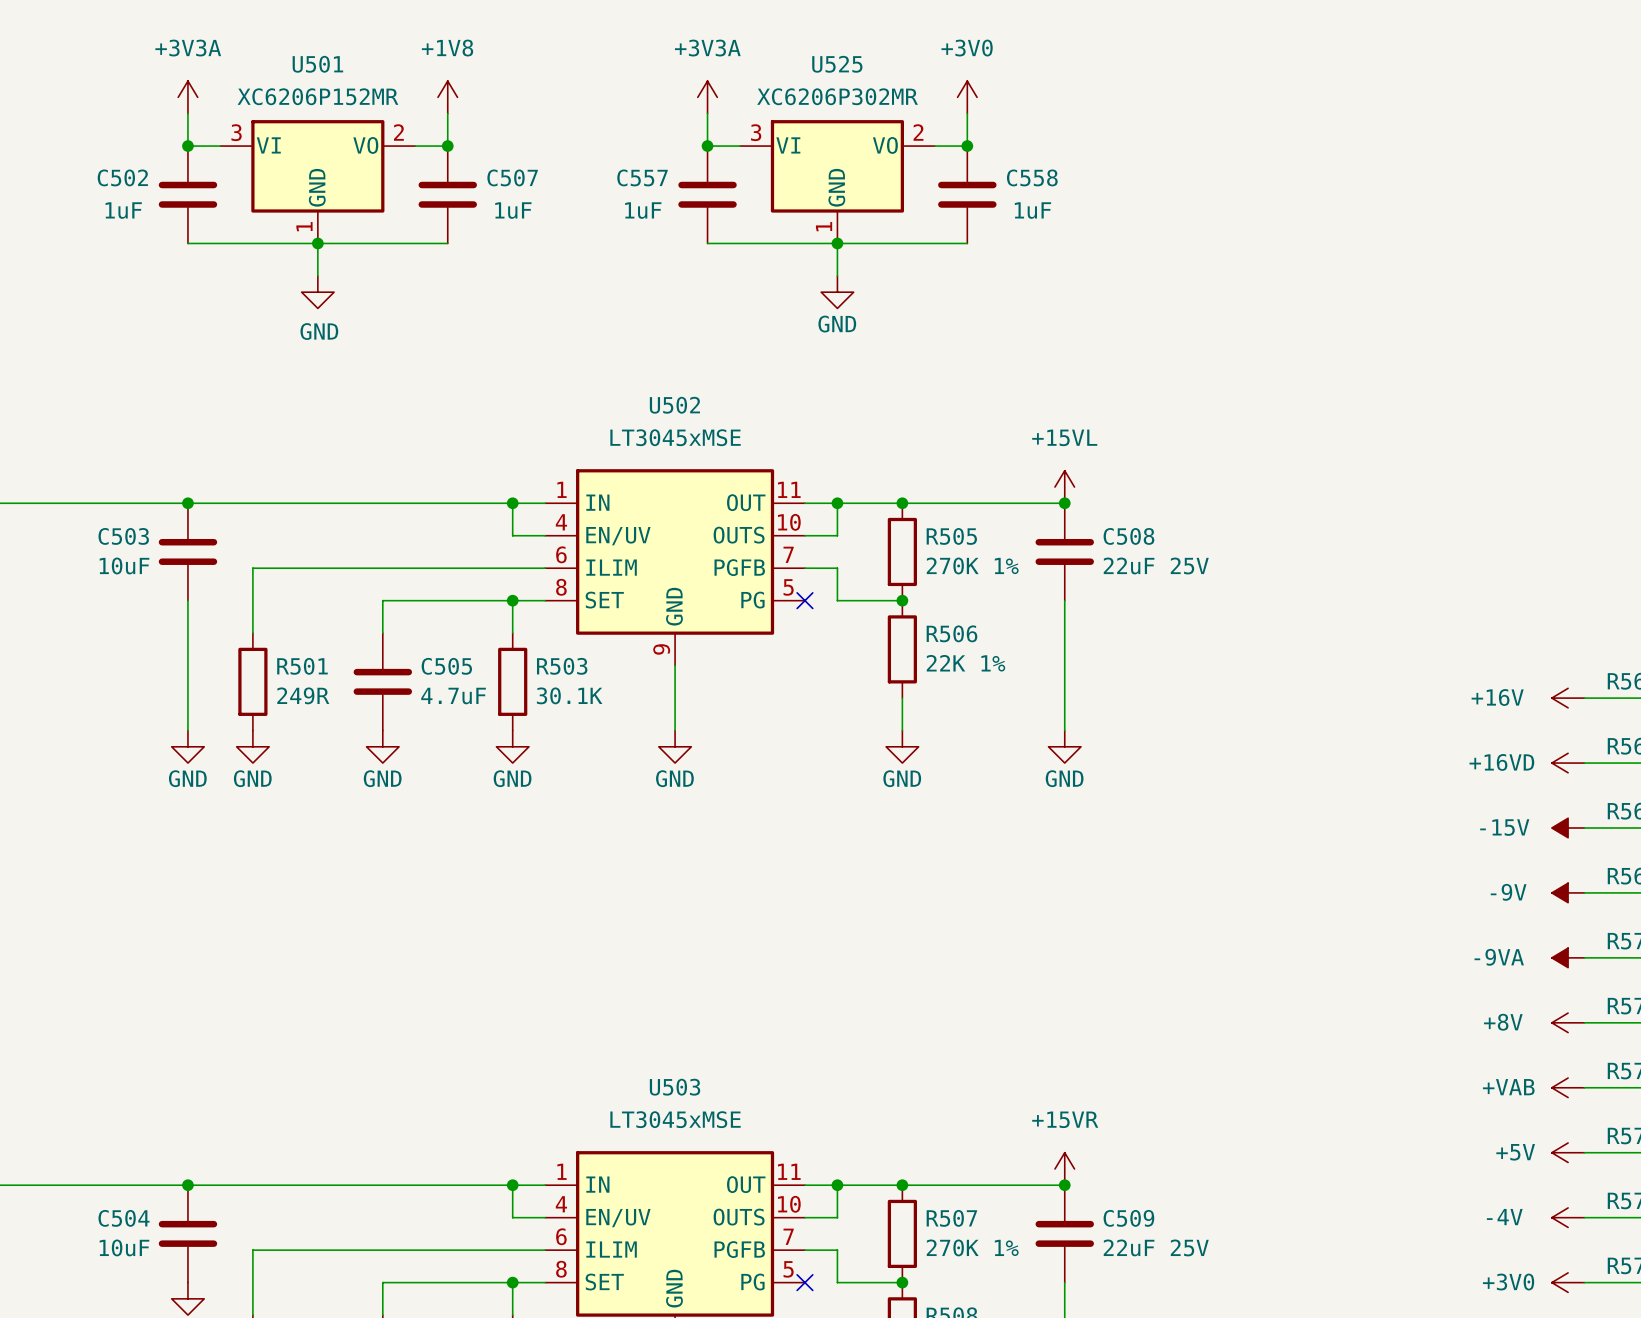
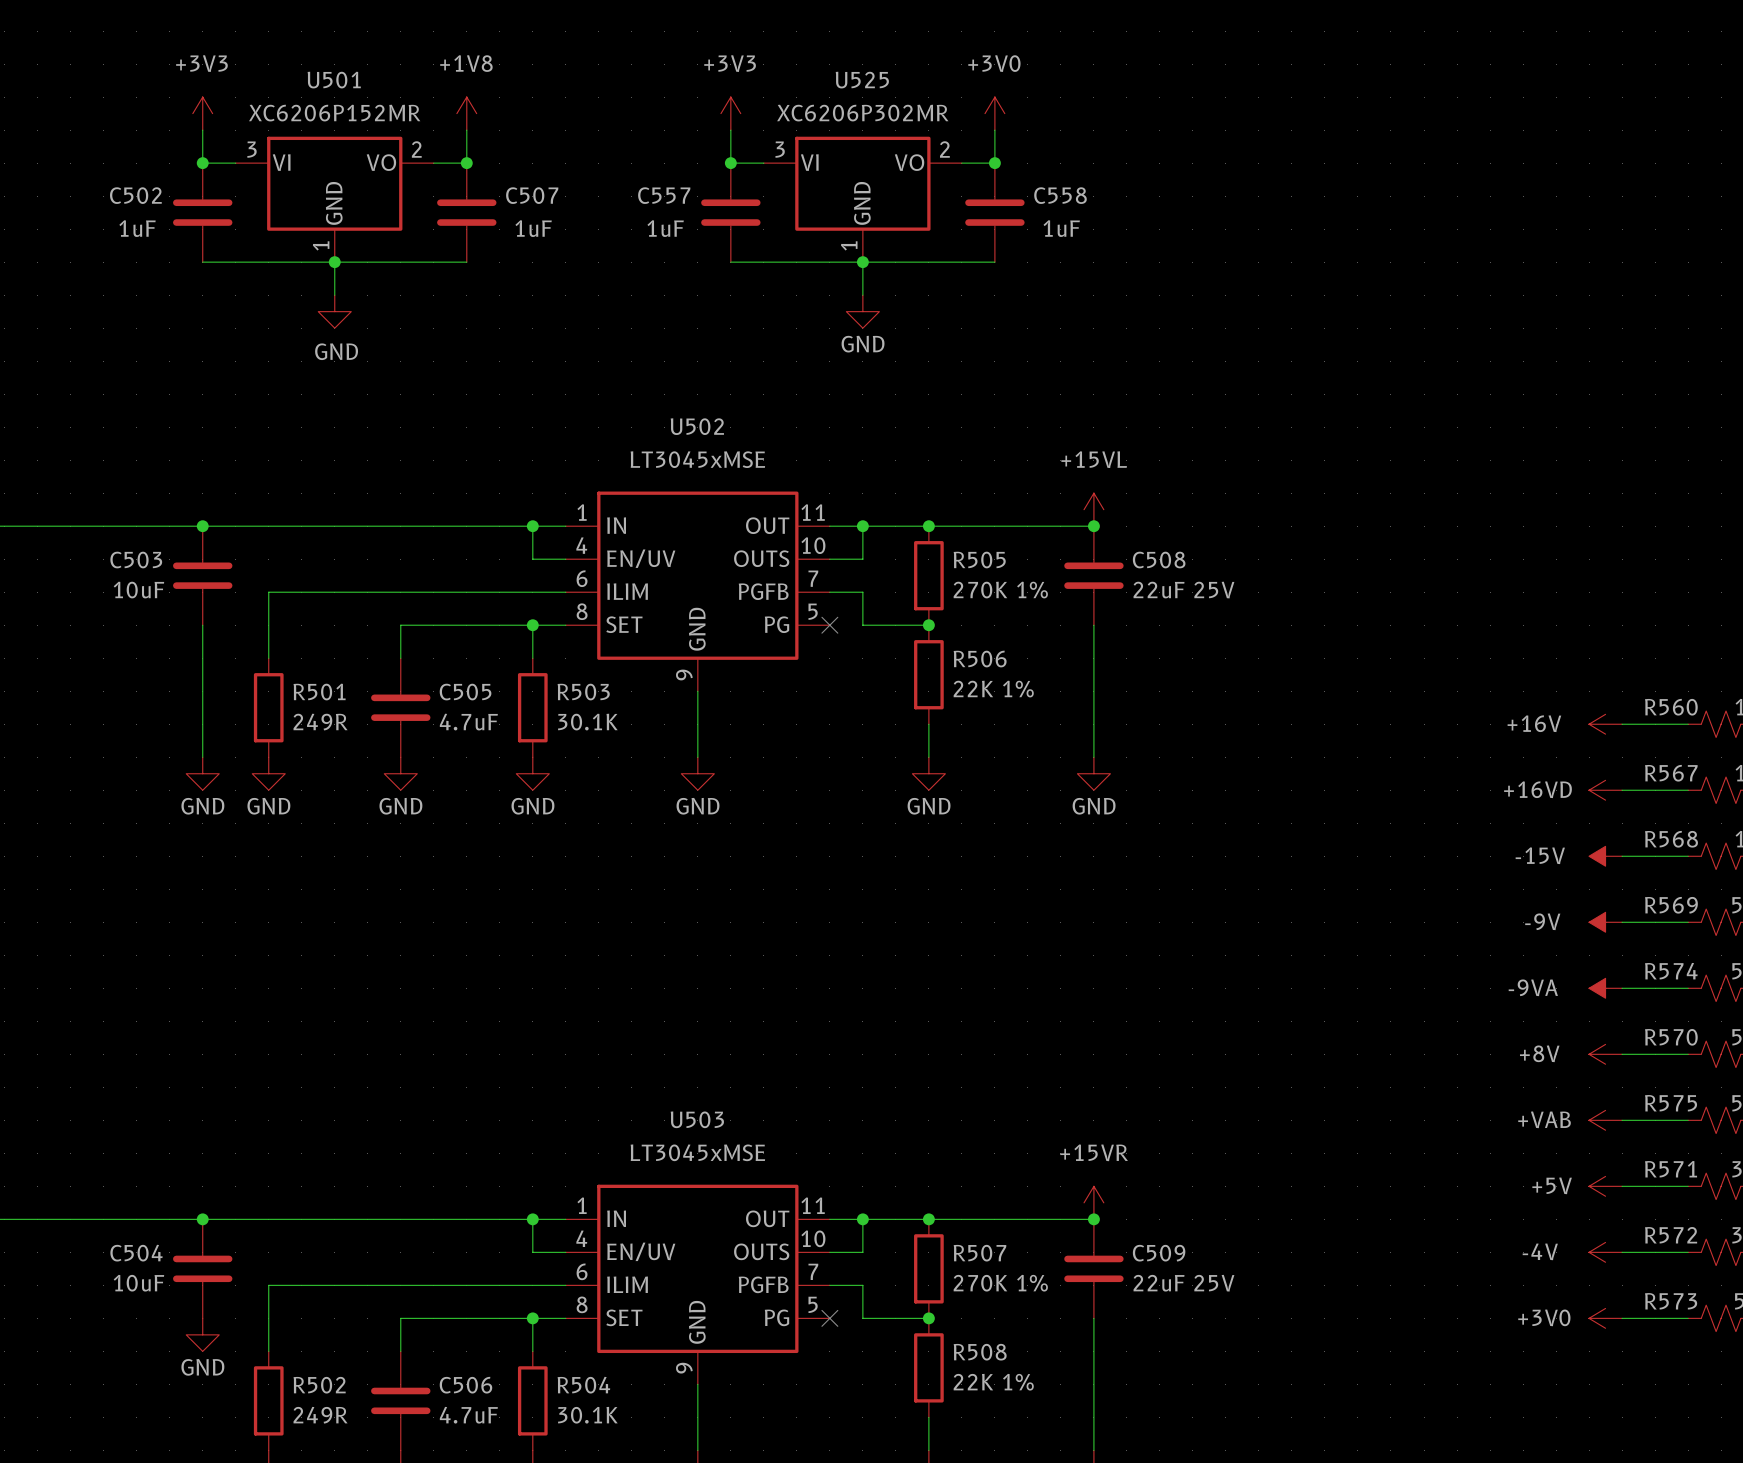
power symbol: +3V3A (187, 97) -> +3V3 (202, 113)
power symbol: +3V3A (707, 97) -> +3V3 (730, 113)

